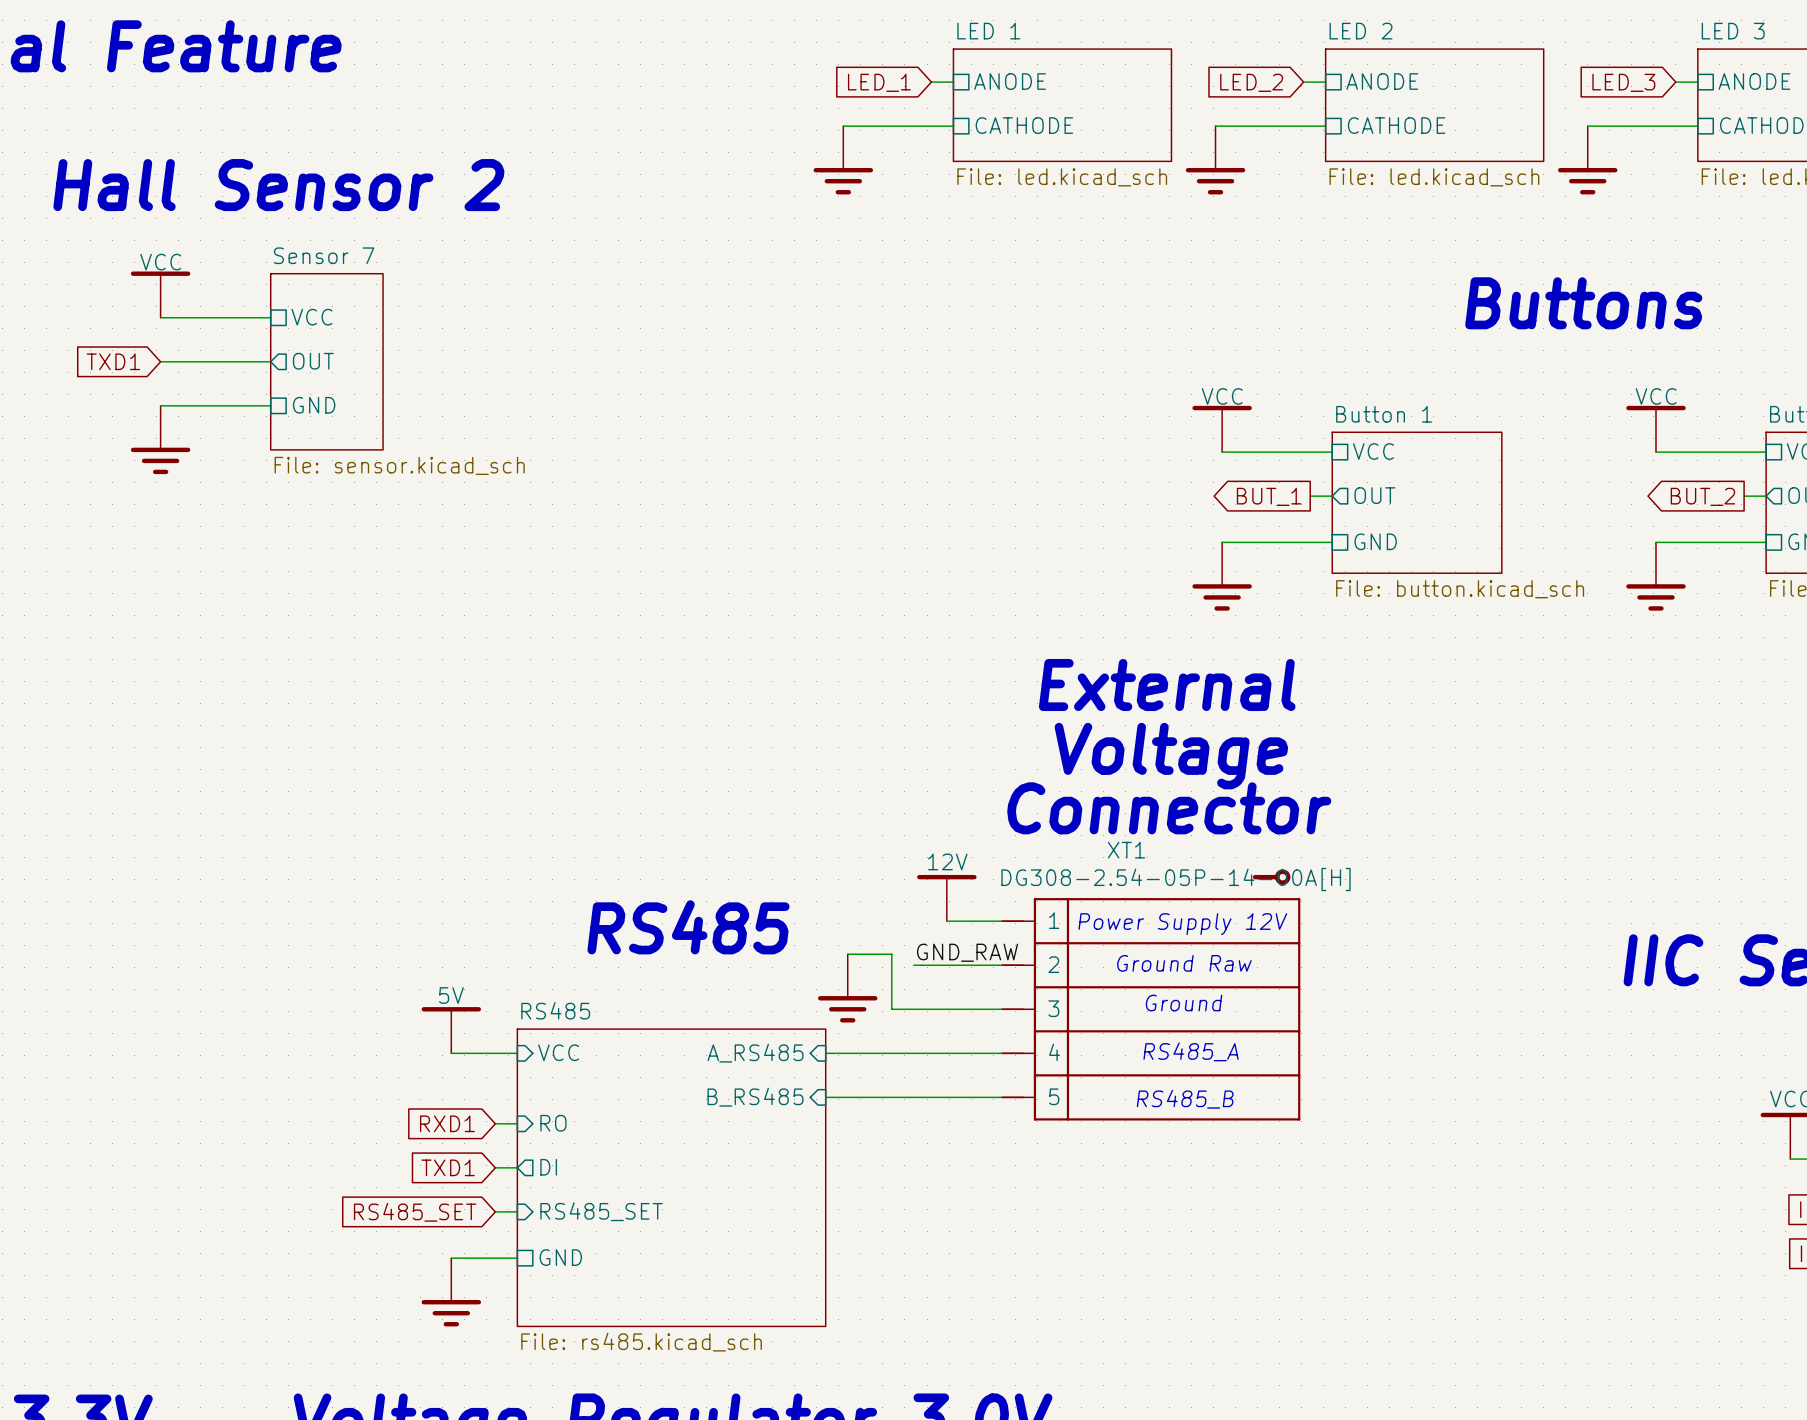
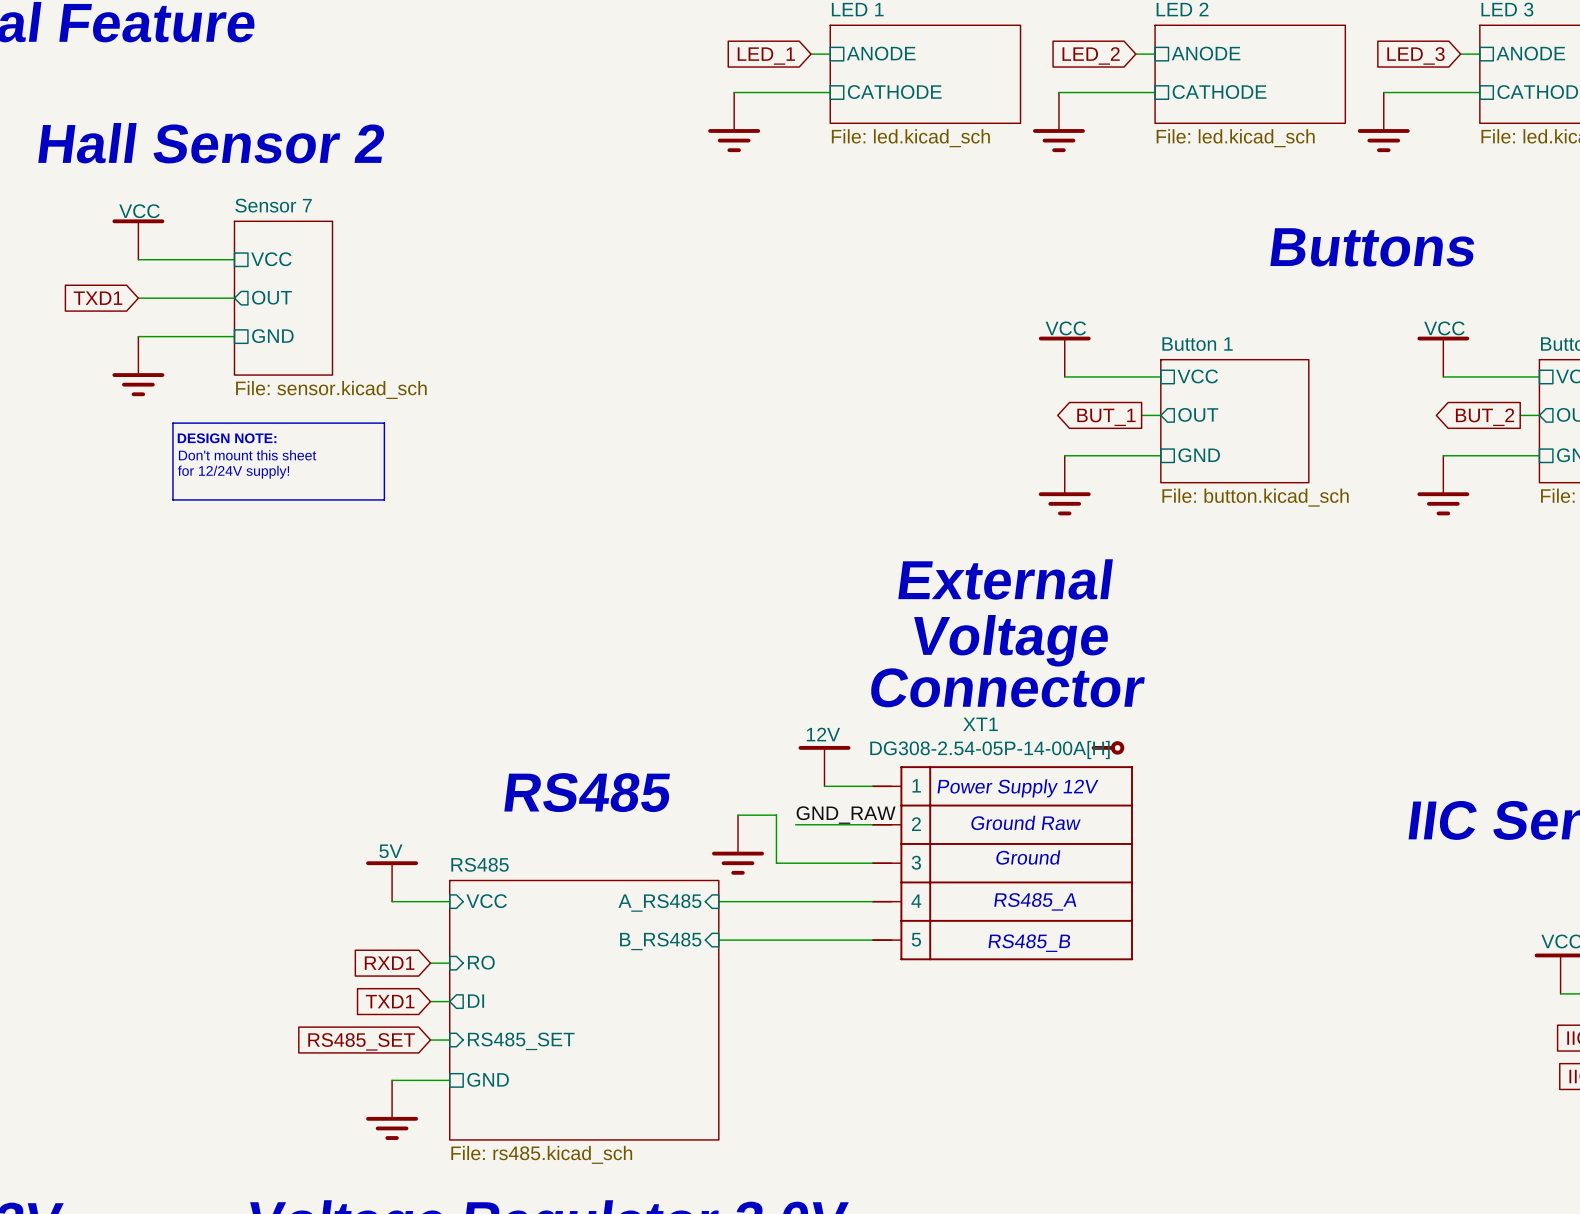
line: none -> (172, 423) (172, 499) (384, 499) (384, 423) (172, 423)
text: none -> DESIGN NOTE: (227, 438)
text: none -> Don't mount this sheet (247, 455)
text: none -> for 12/24V supply! (233, 472)

